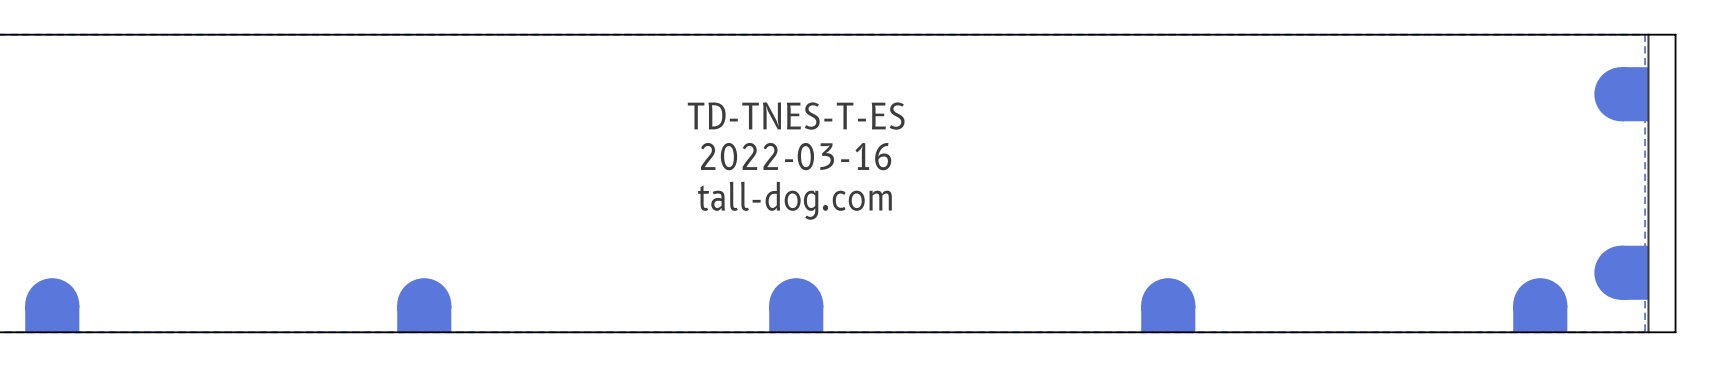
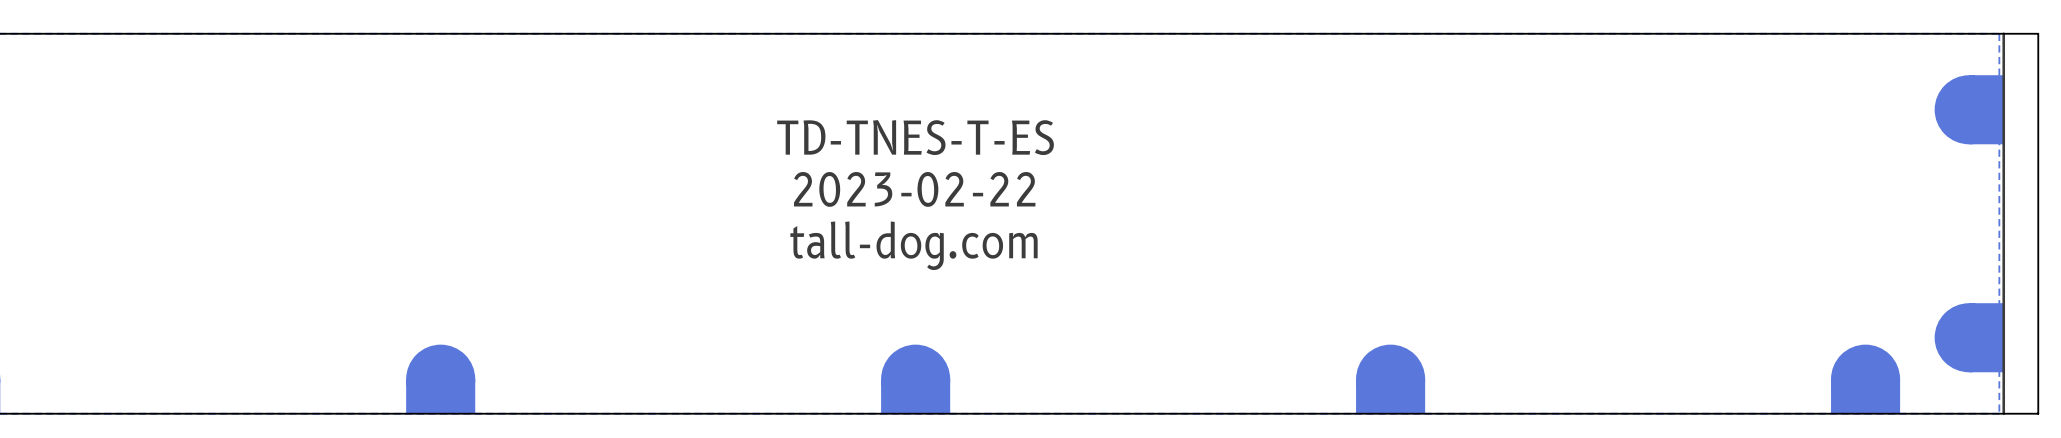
text: 2022-03-16 (796, 156) -> 2023-02-22 (914, 189)

